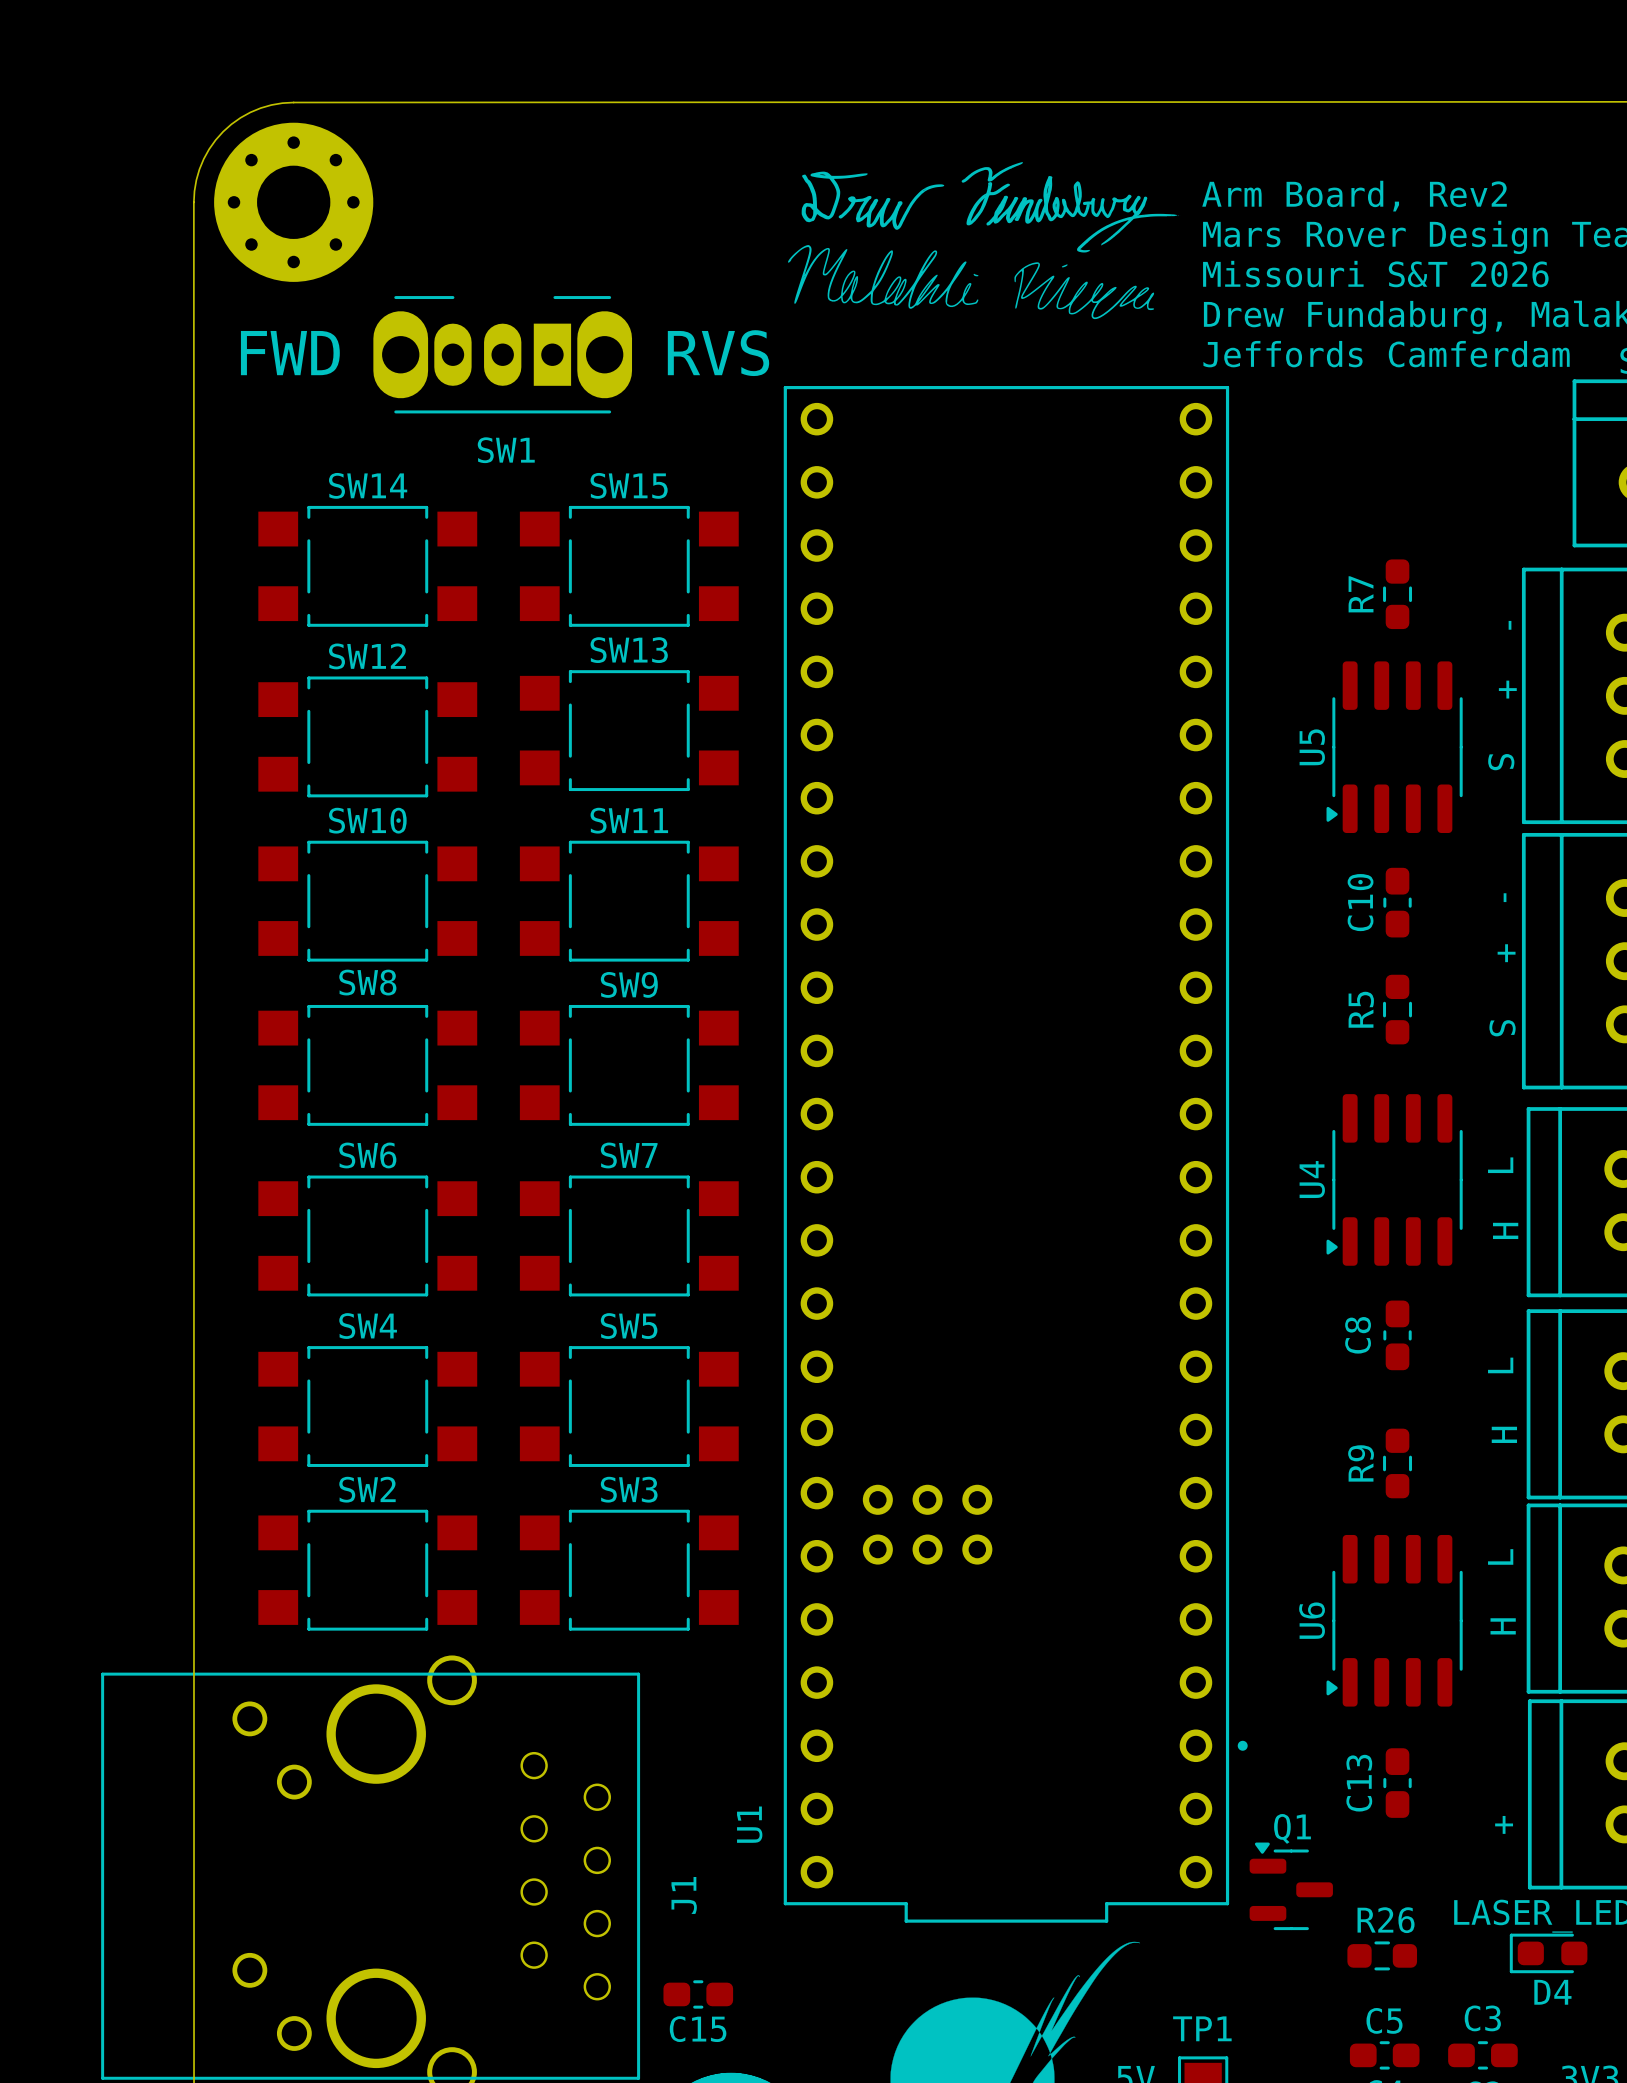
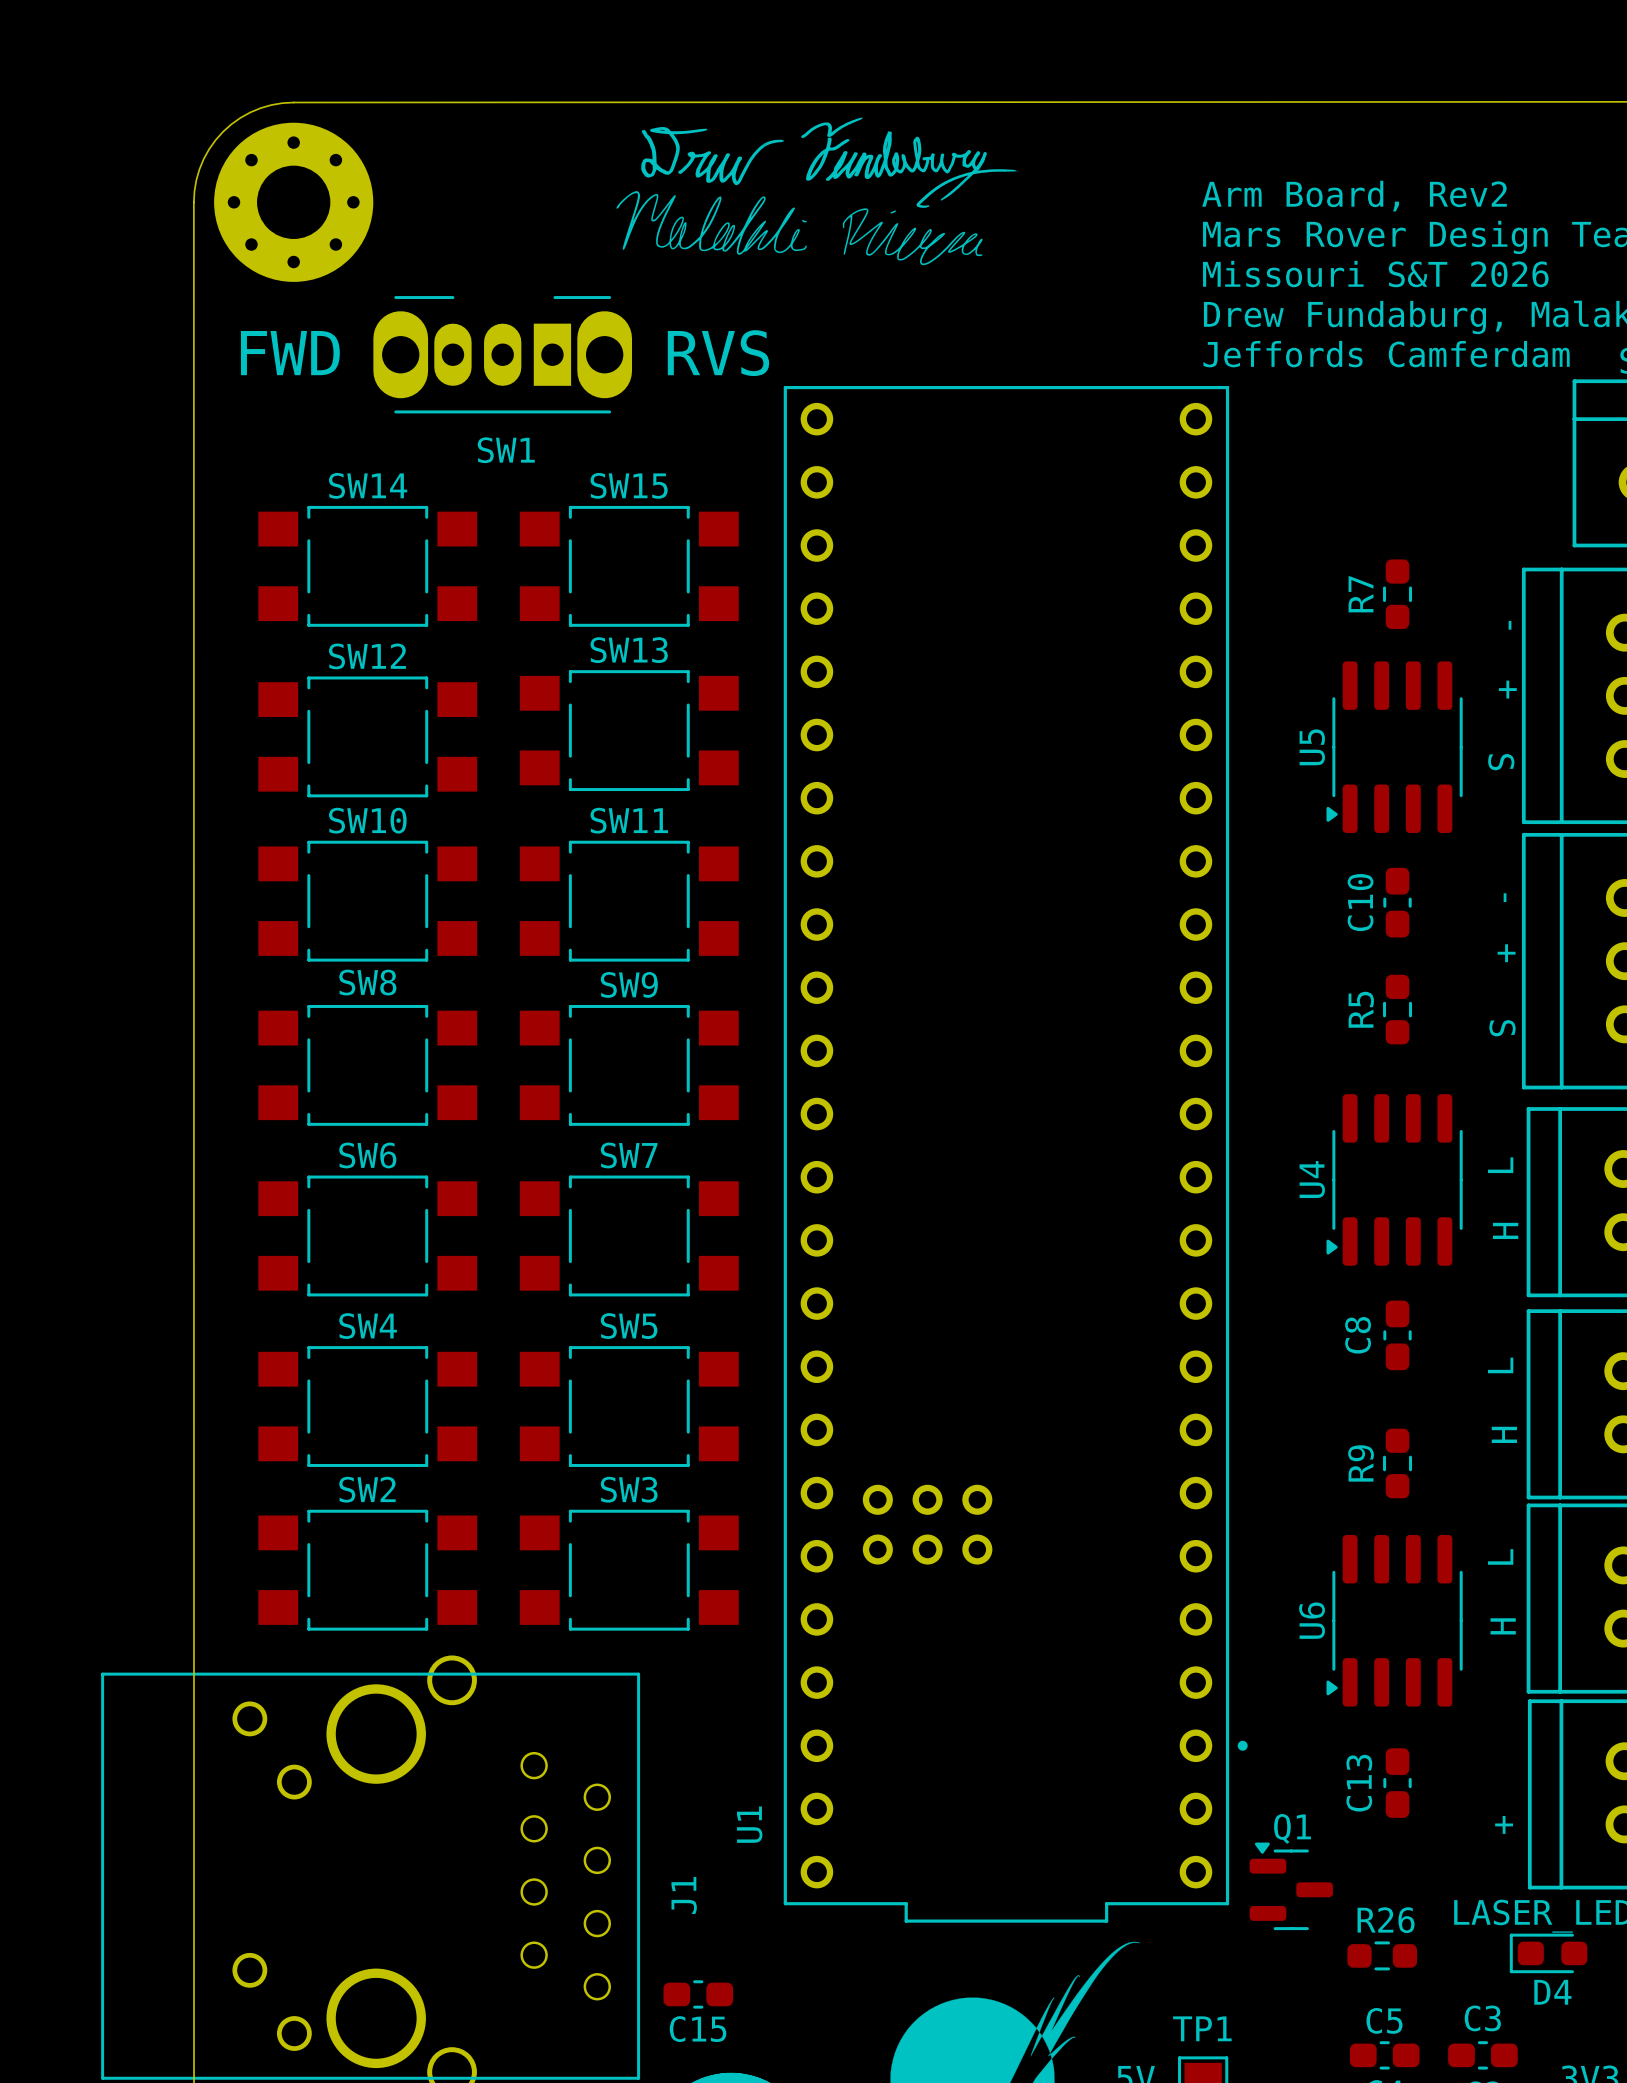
drawing position: (1003, 207) -> (843, 162)
drawing position: (971, 282) -> (799, 228)

